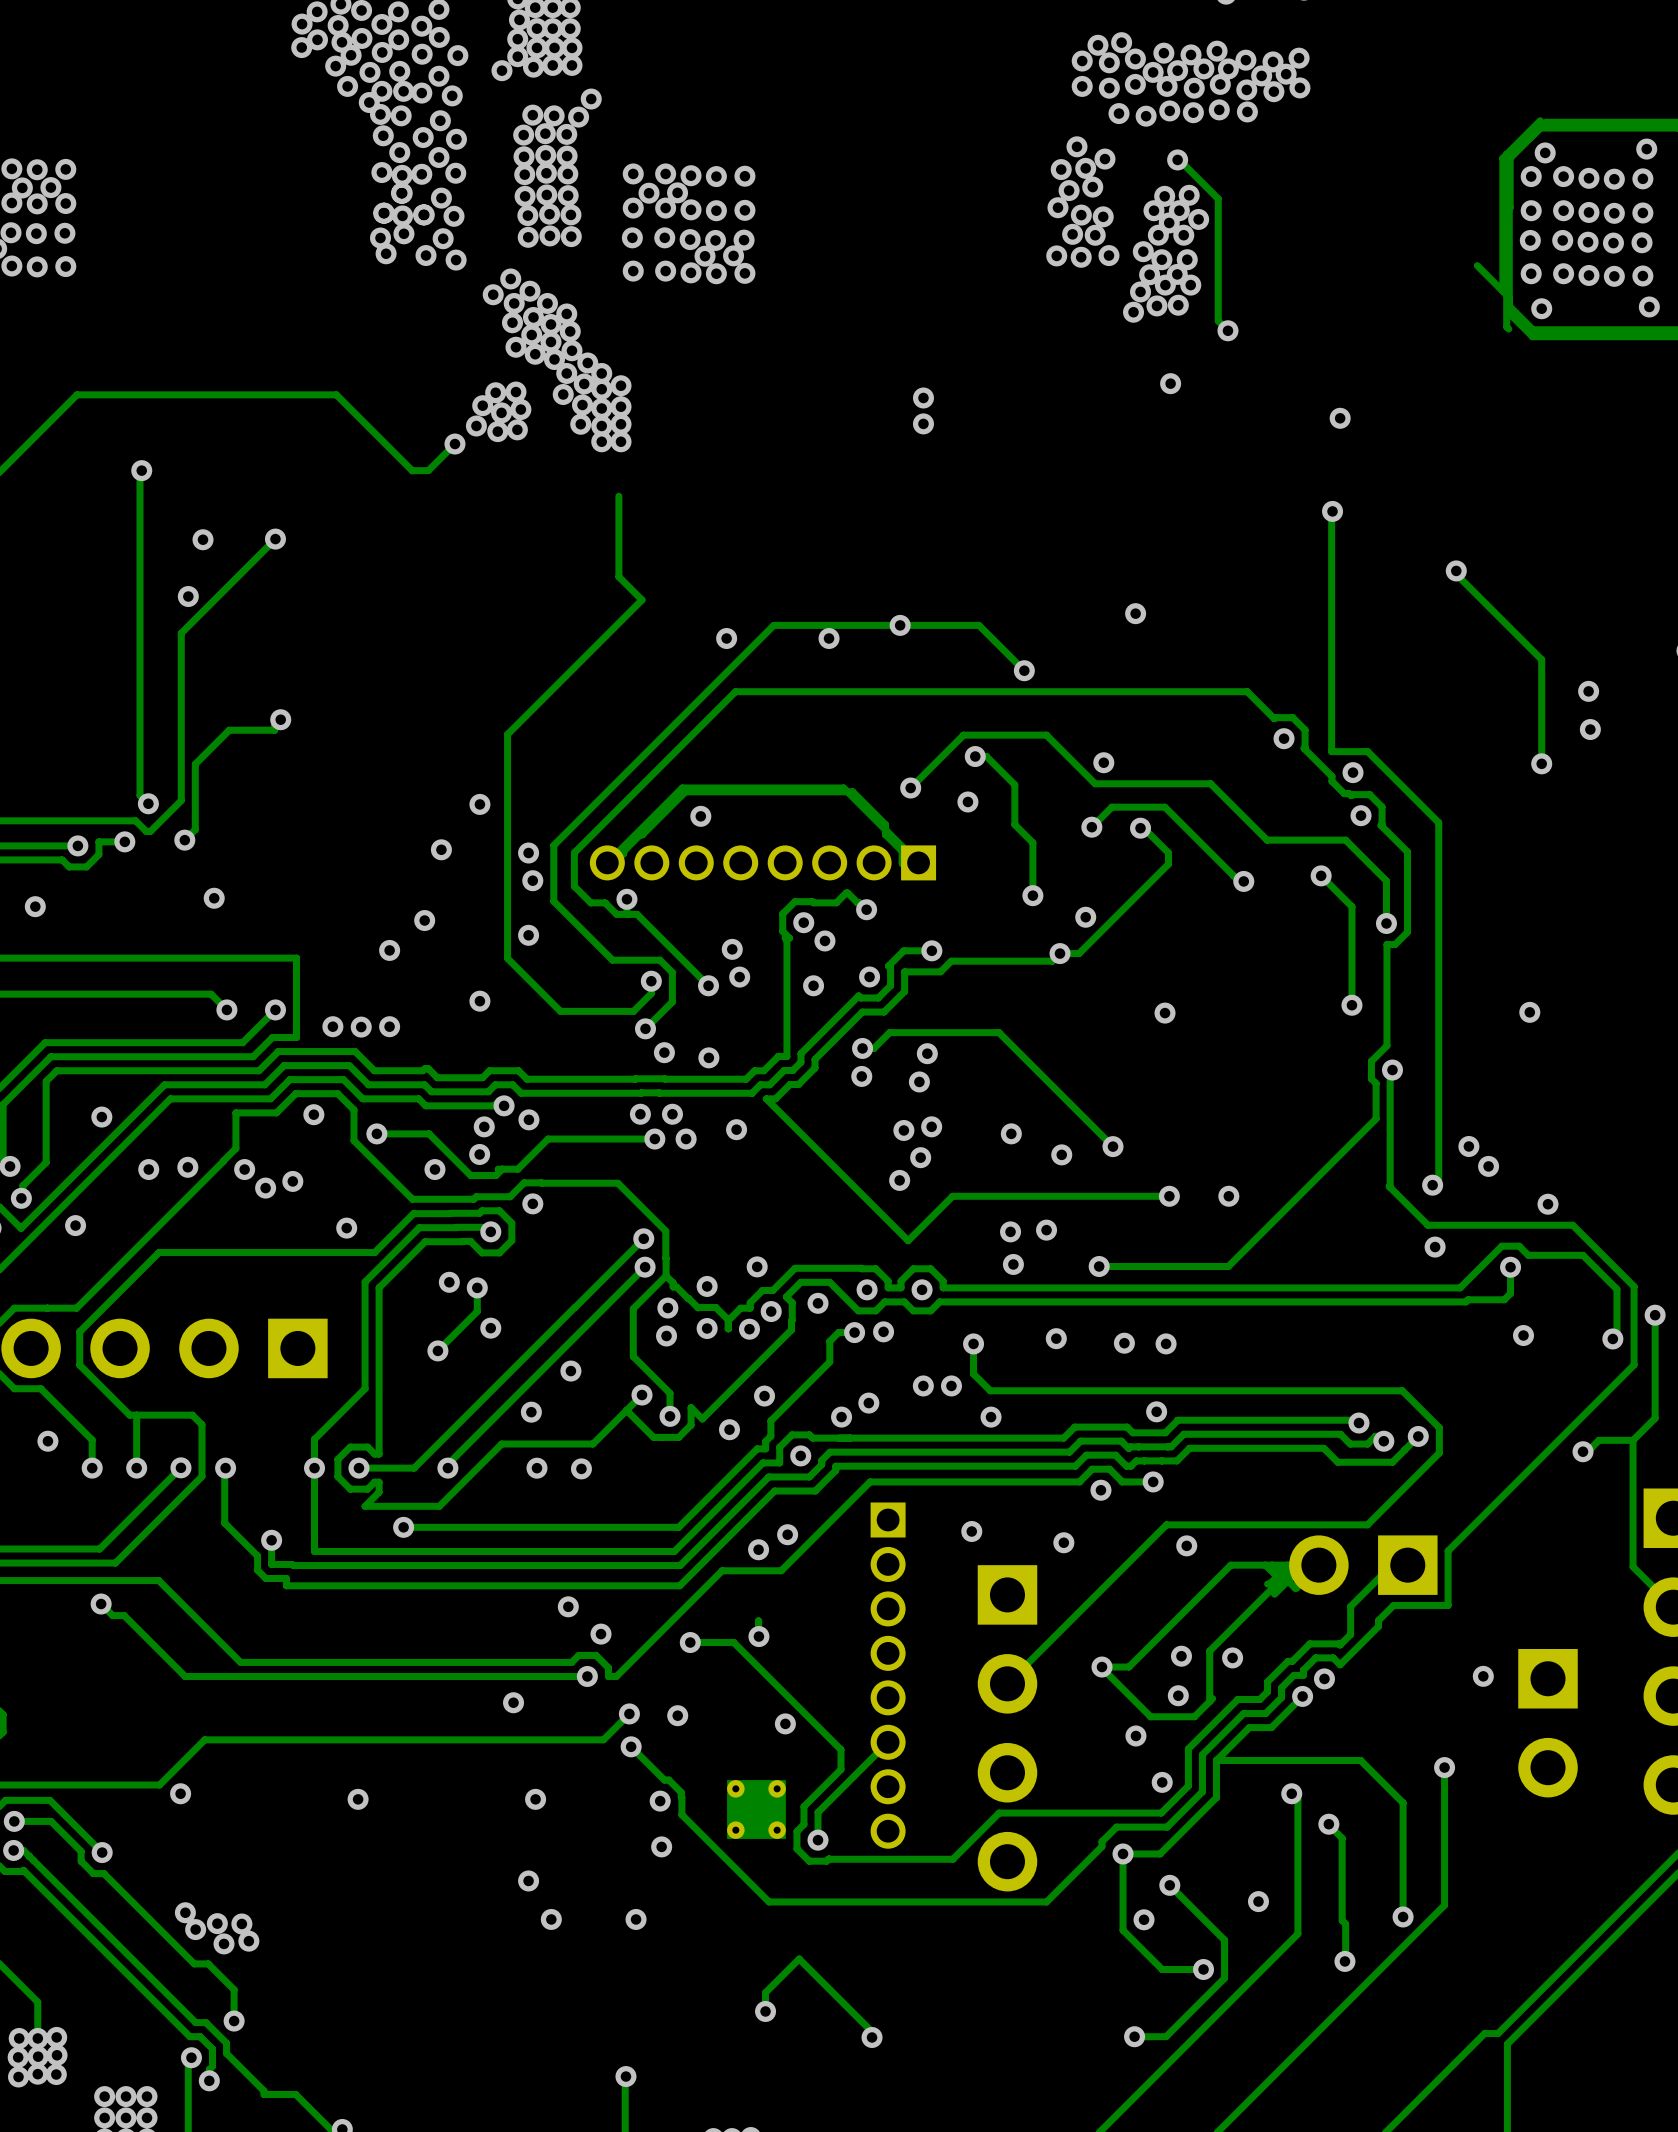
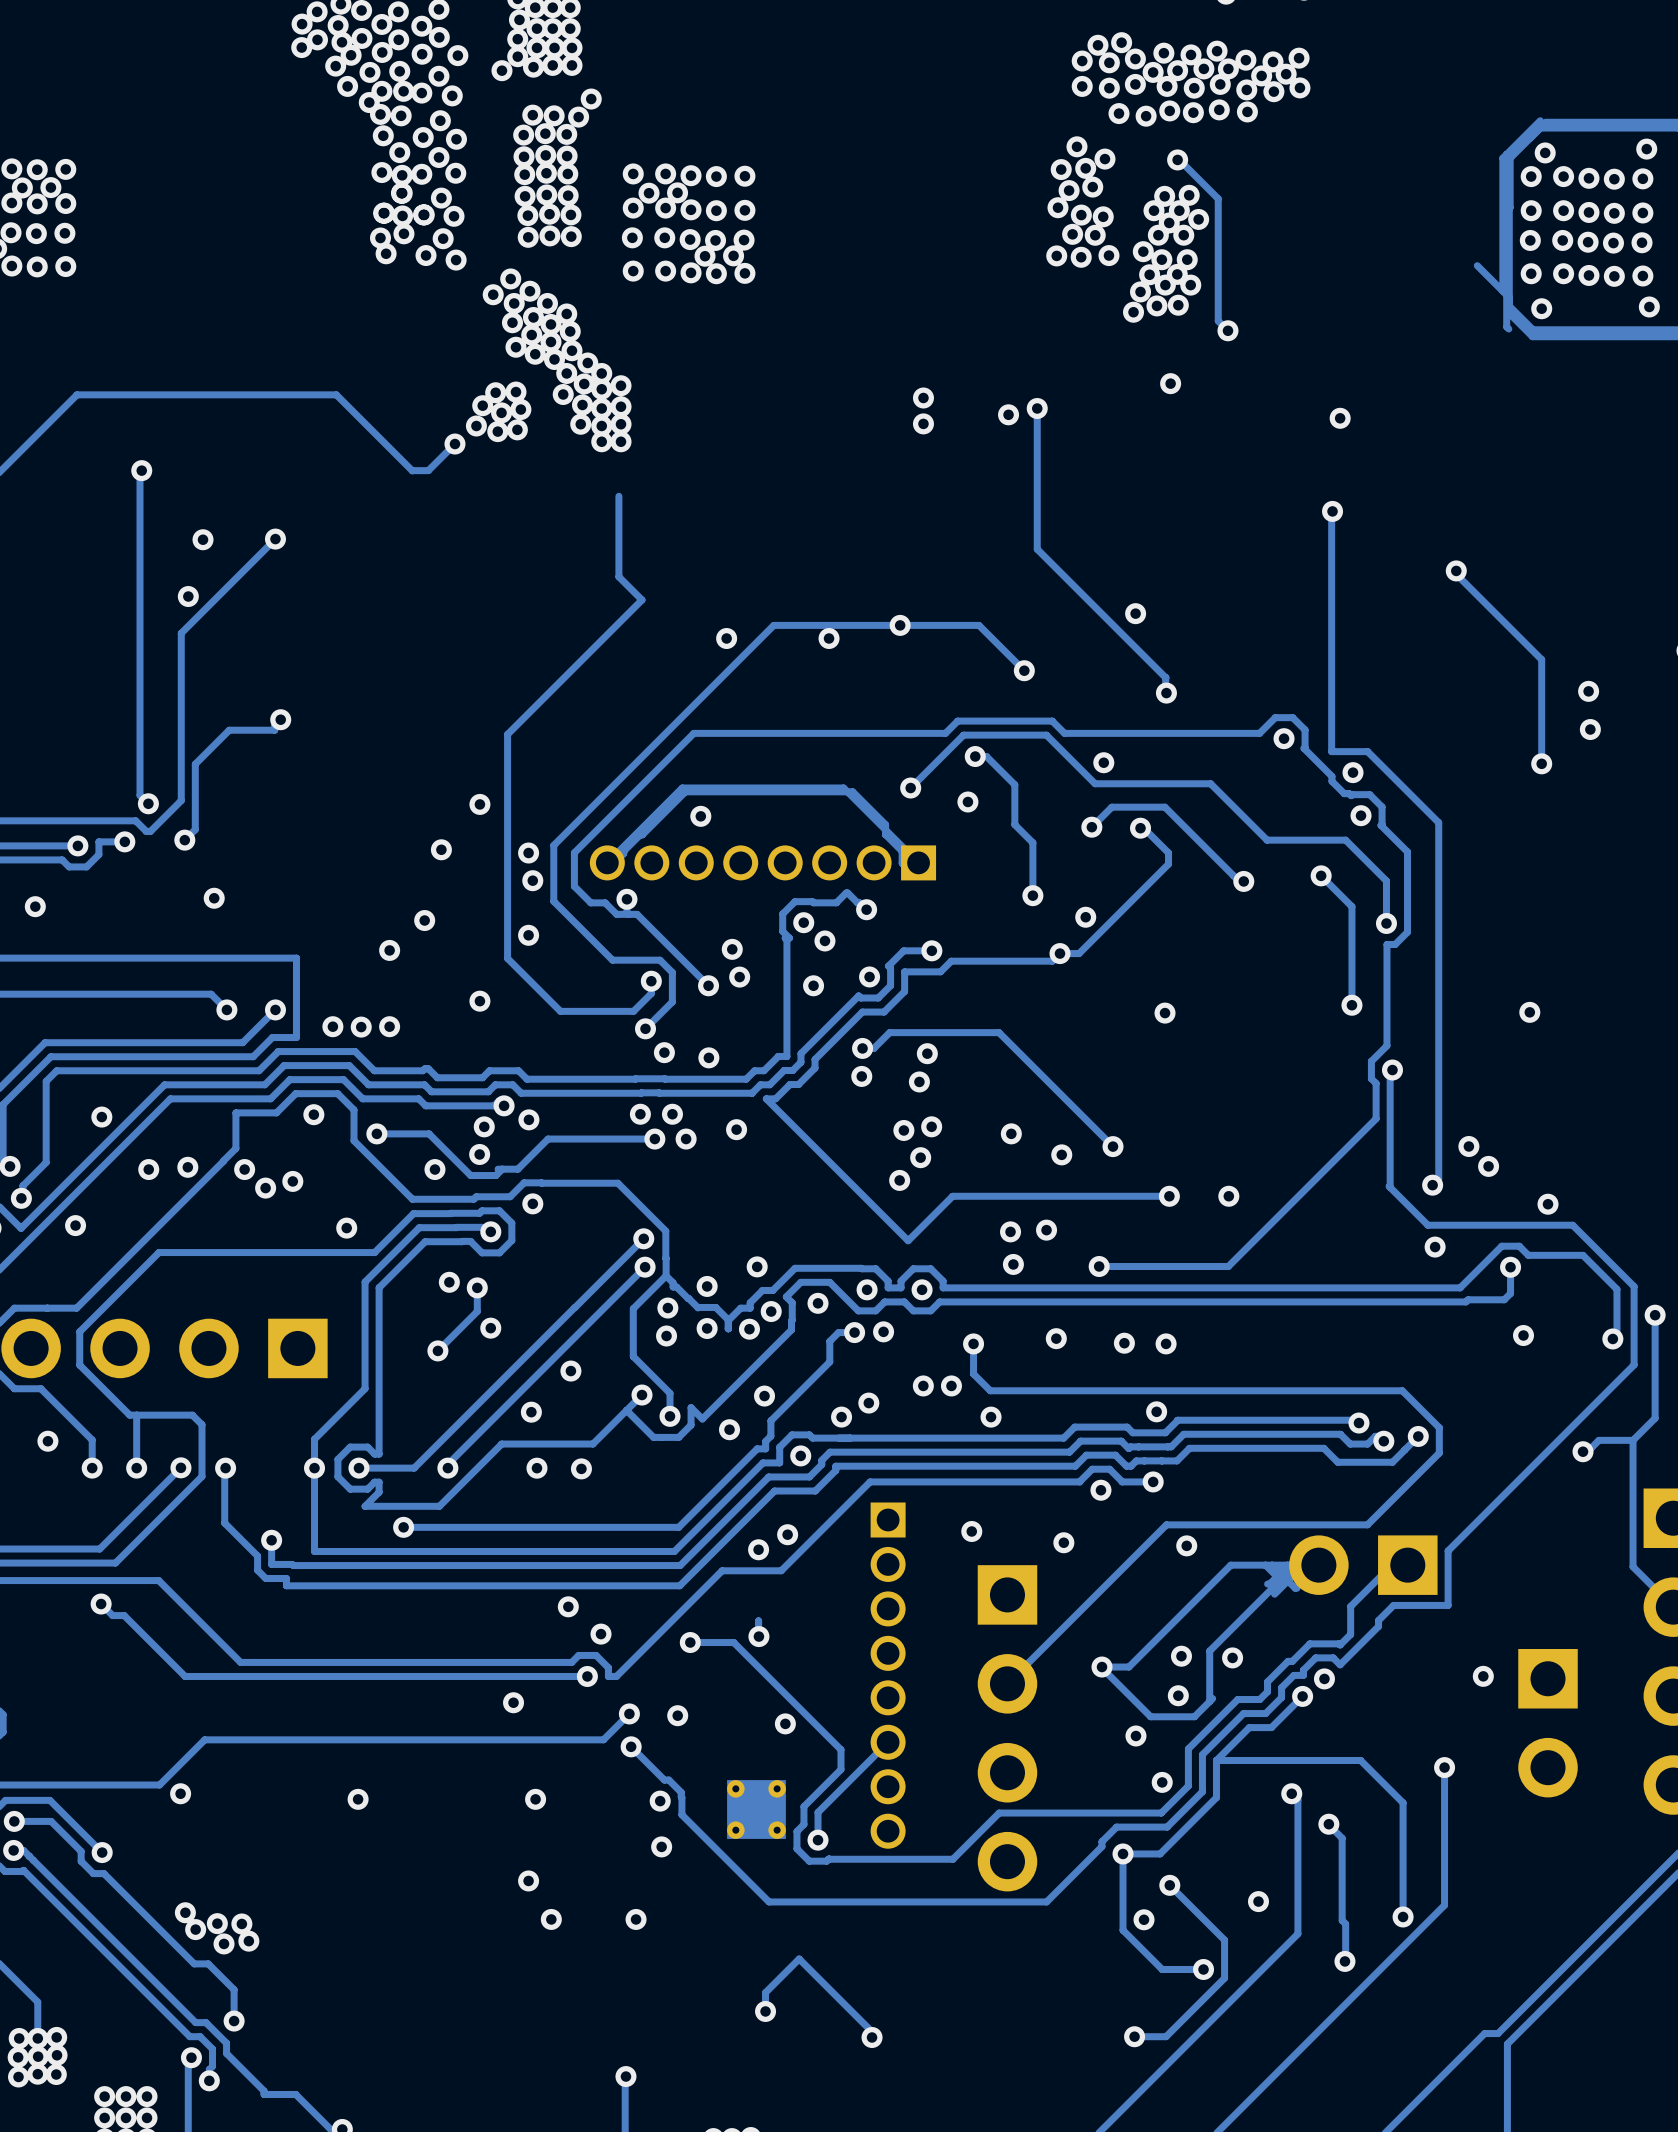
track: none -> (1037, 408) (1037, 549) (1165, 677) (1166, 693)
via: none -> (1037, 408)
via: none -> (1008, 414)
via: none -> (1166, 693)
track: (1274, 718) (1247, 691) (735, 691) (693, 733) -> (1274, 718) (1259, 733) (1064, 733) (1052, 721) (957, 721) (945, 733) (693, 733)

